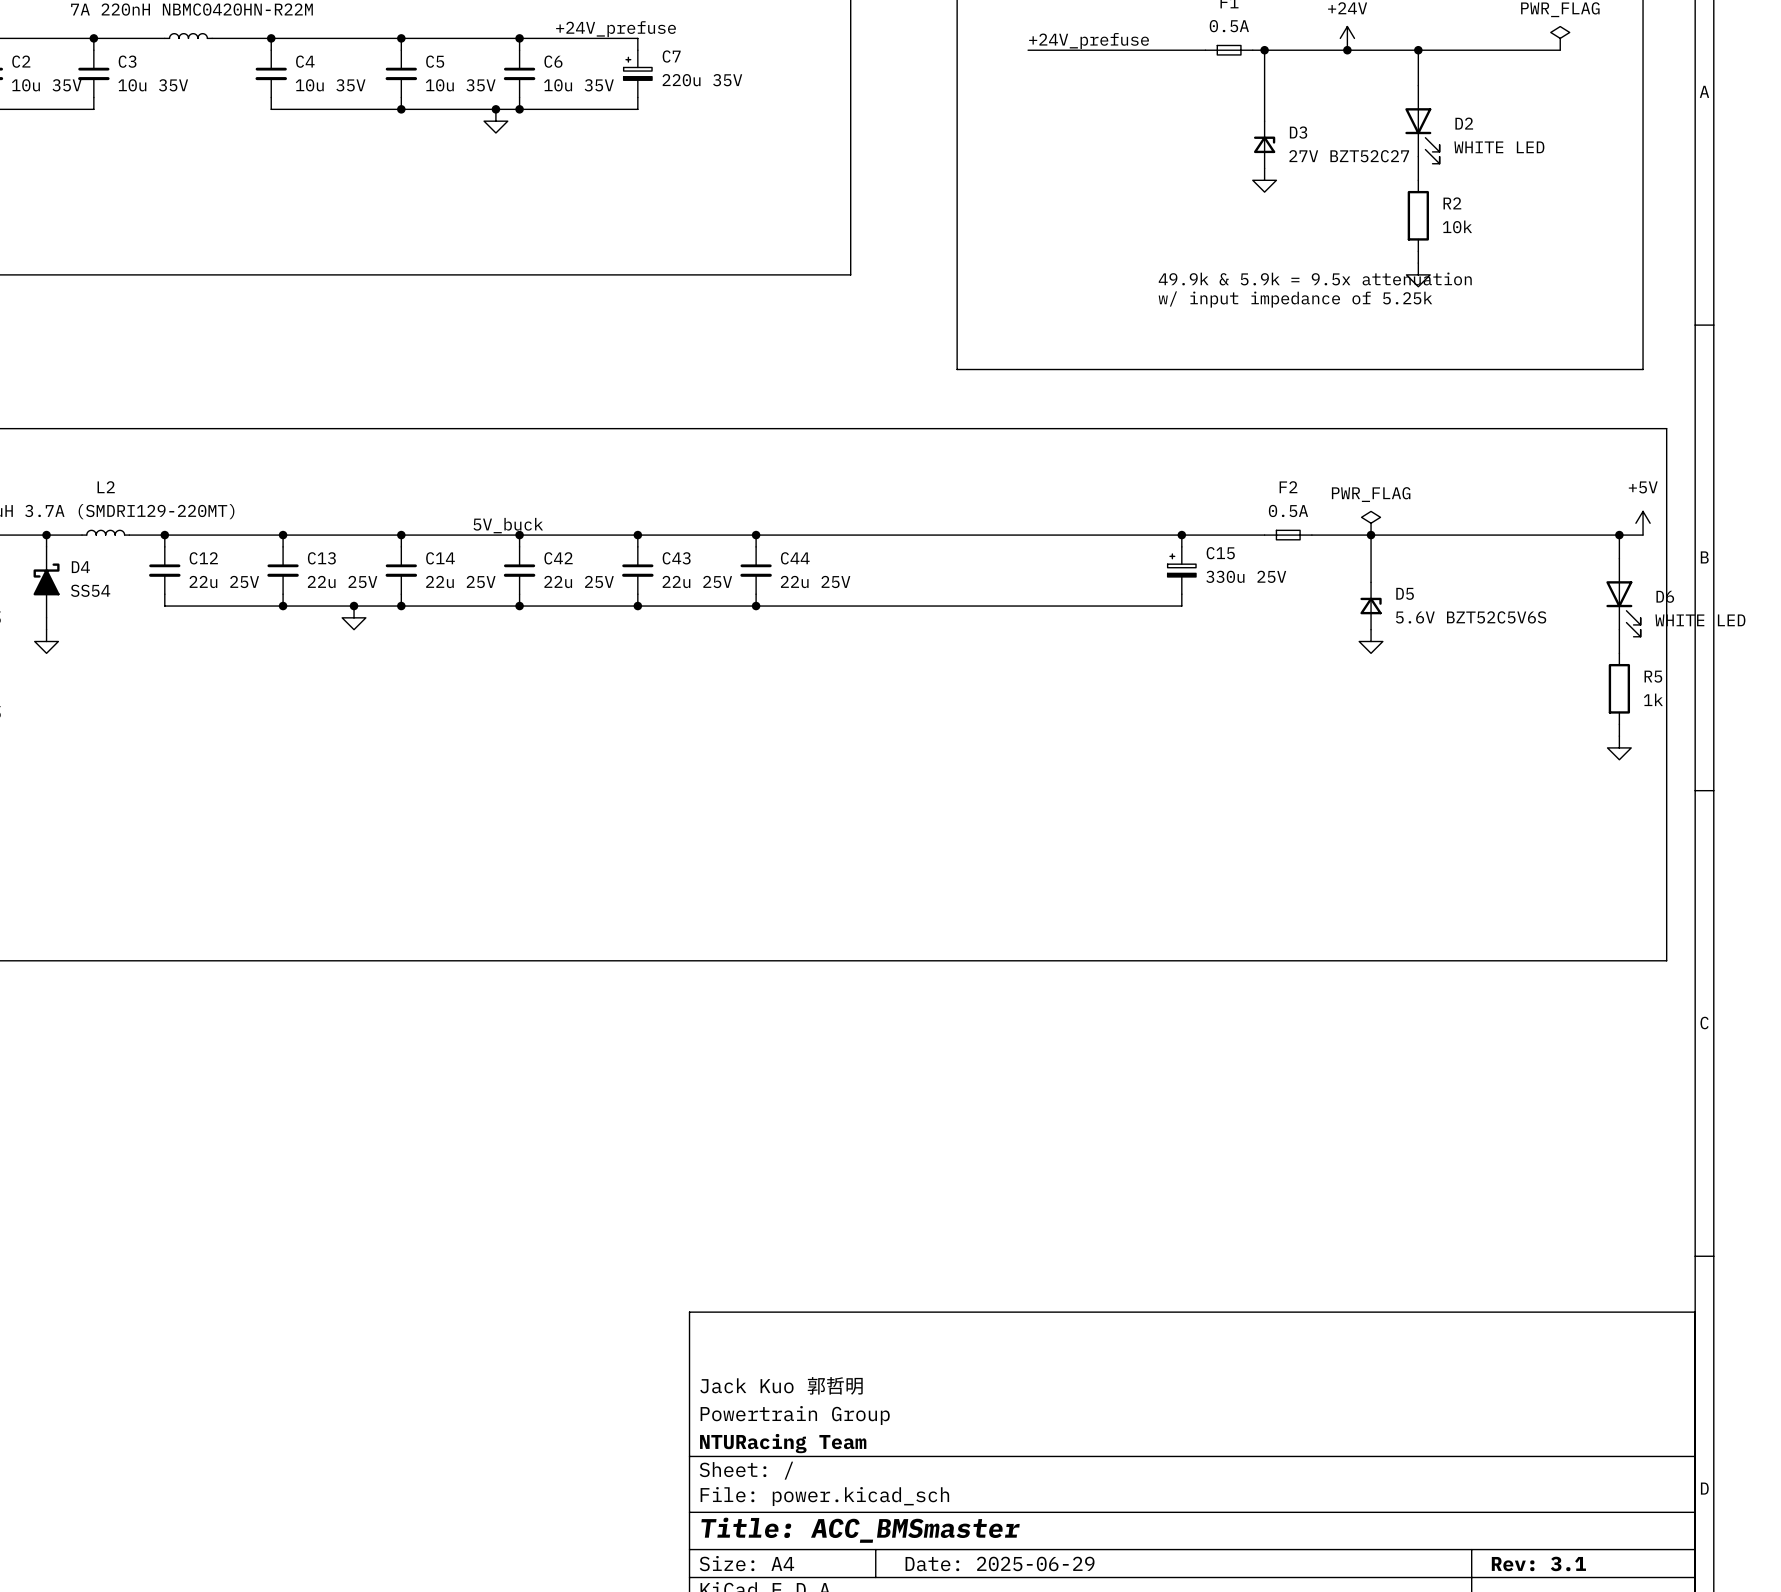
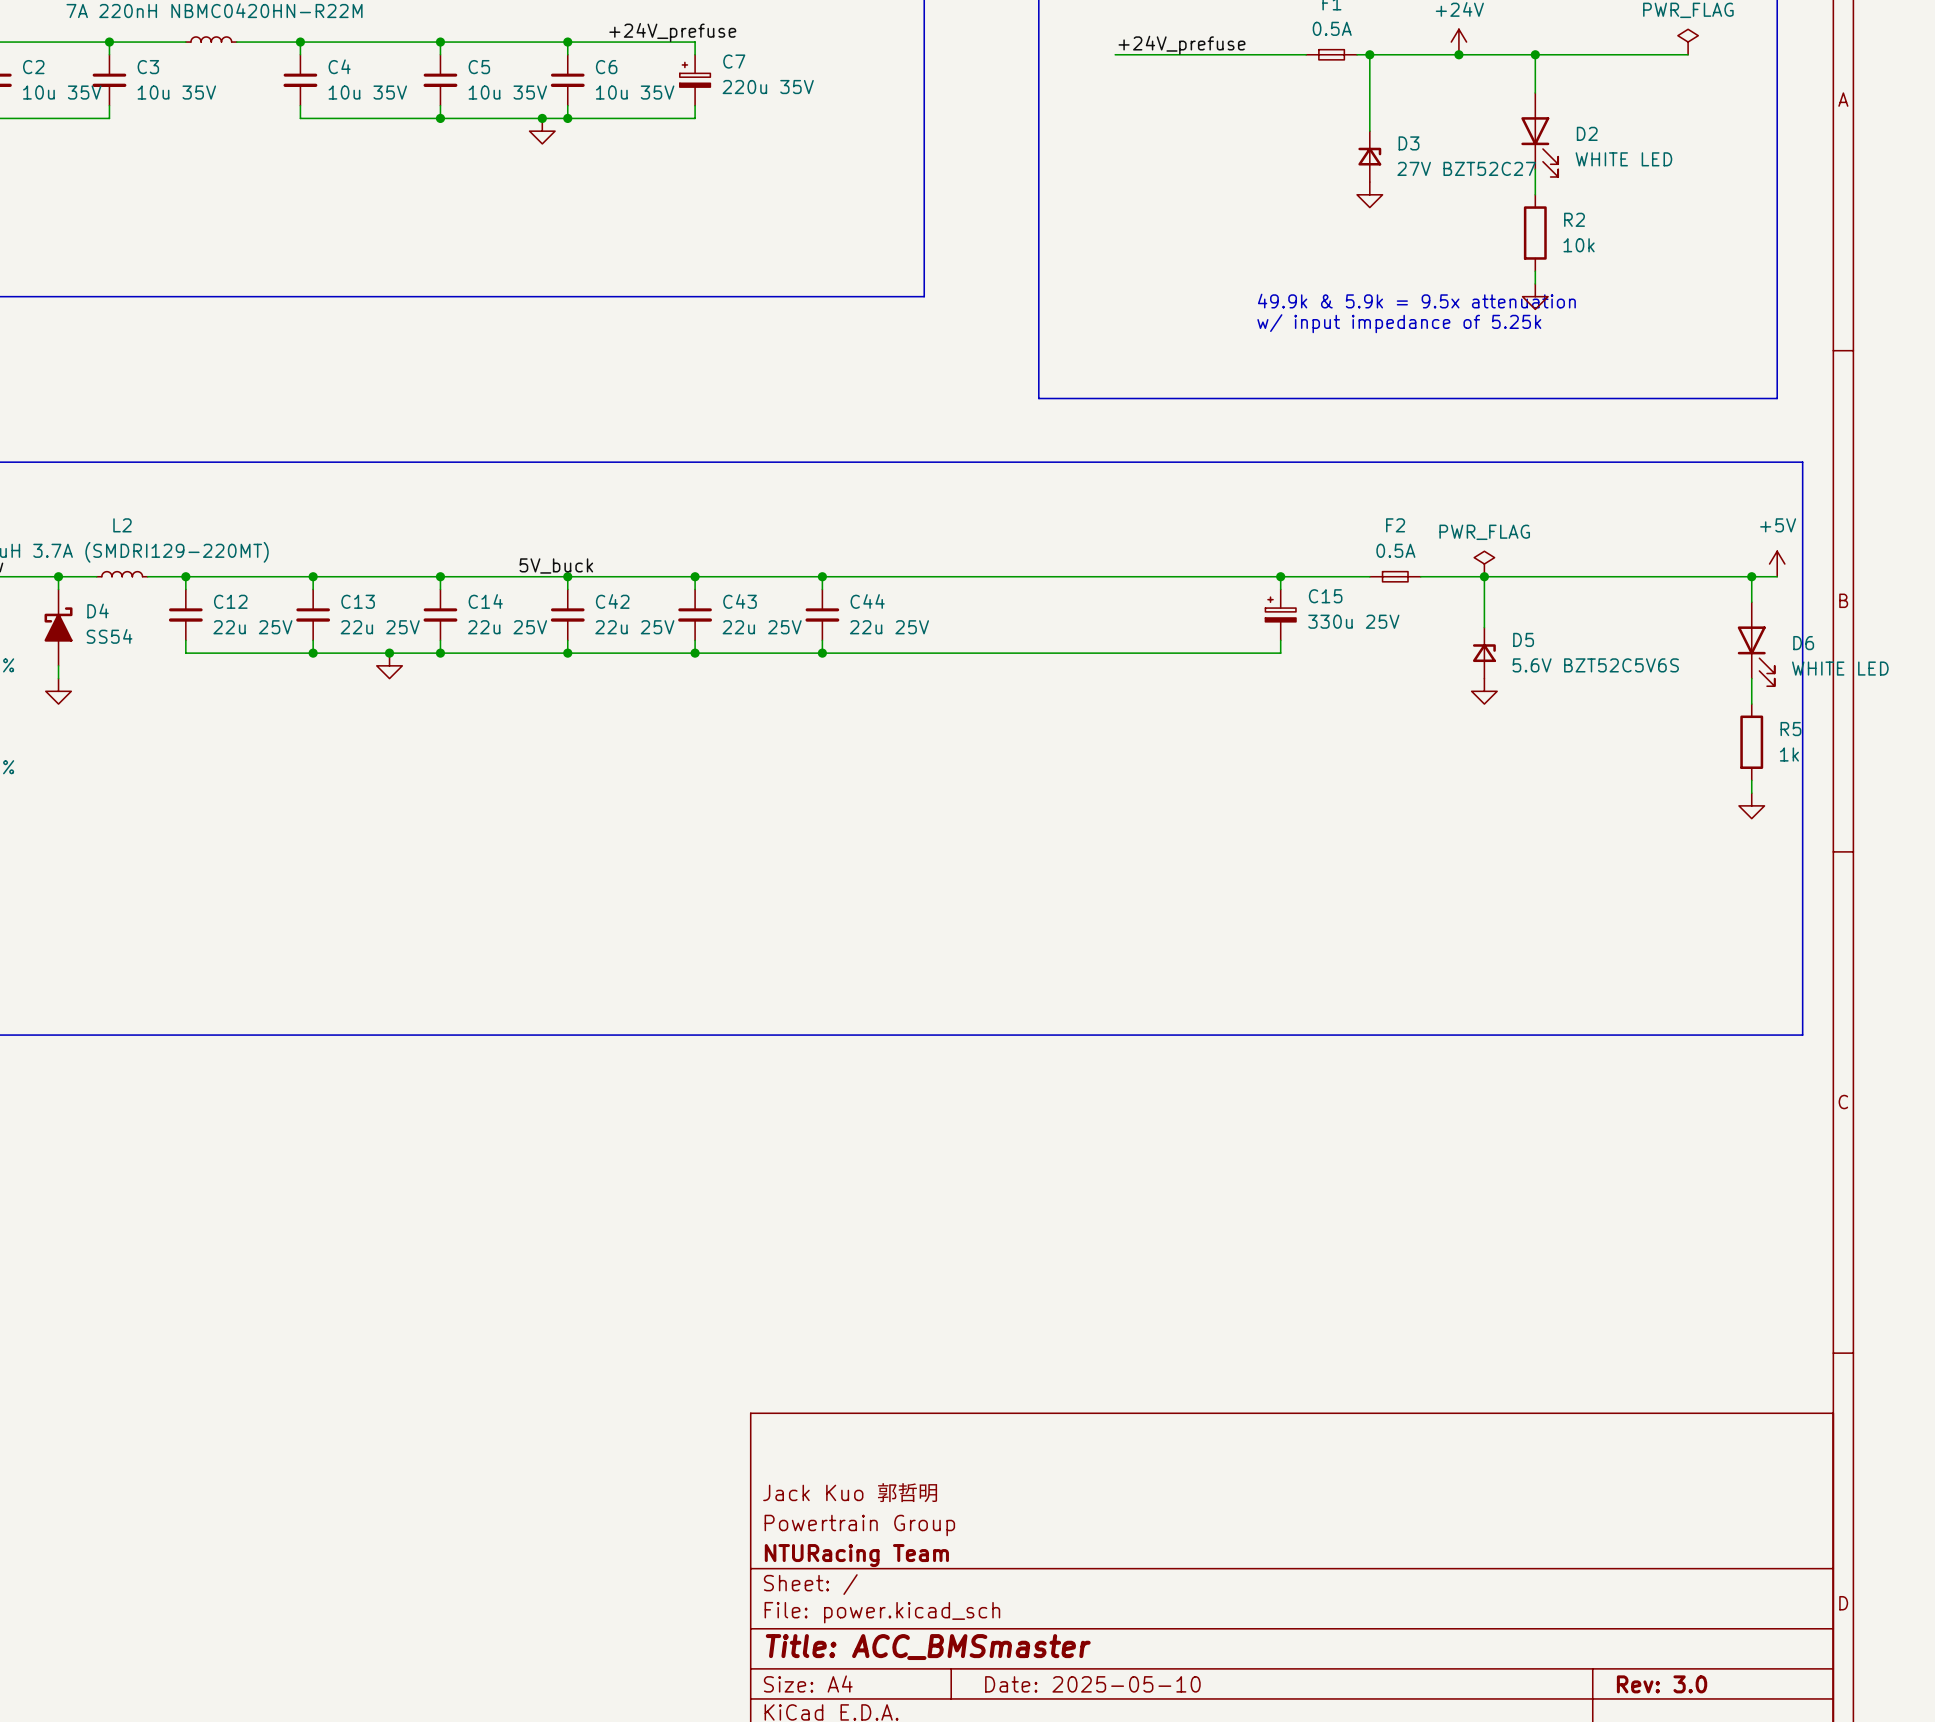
title block: Date: 2025-06-29 (1000, 1563) -> Date: 2025-05-10 (1092, 1684)
title block: Rev: 3.1 (1538, 1563) -> Rev: 3.0 (1662, 1684)

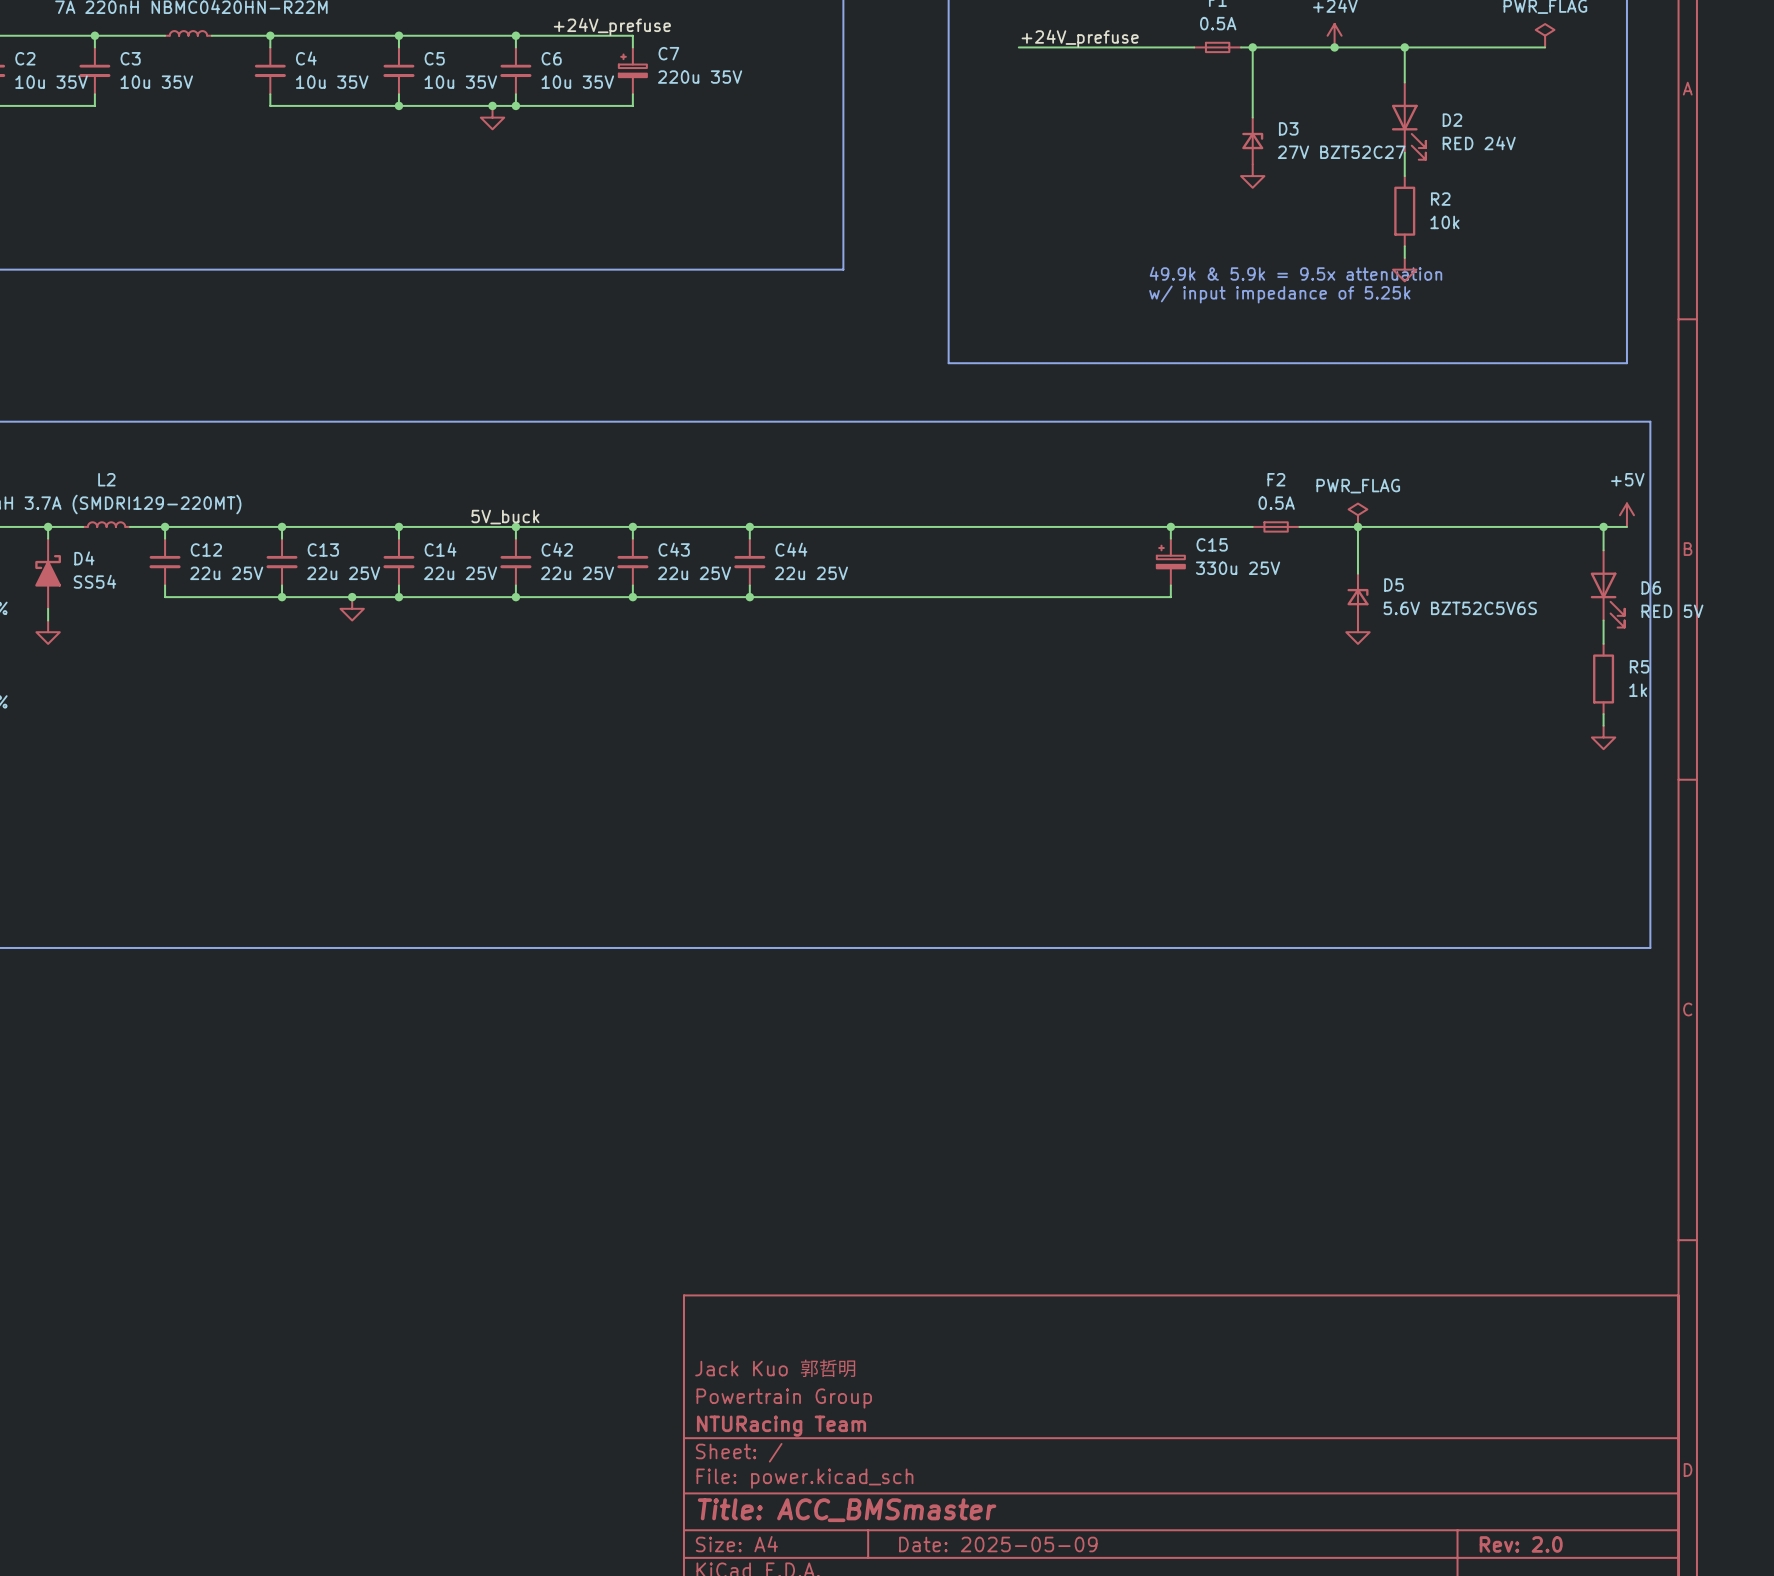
D2 value: WHITE LED (1623, 159) -> RED 24V (1479, 143)
D6 value: WHITE LED (1840, 668) -> RED 5V (1672, 611)
title block: Date: 2025-05-10 (1092, 1684) -> Date: 2025-05-09 (998, 1544)
title block: Rev: 3.0 (1662, 1684) -> Rev: 2.0 (1521, 1544)

